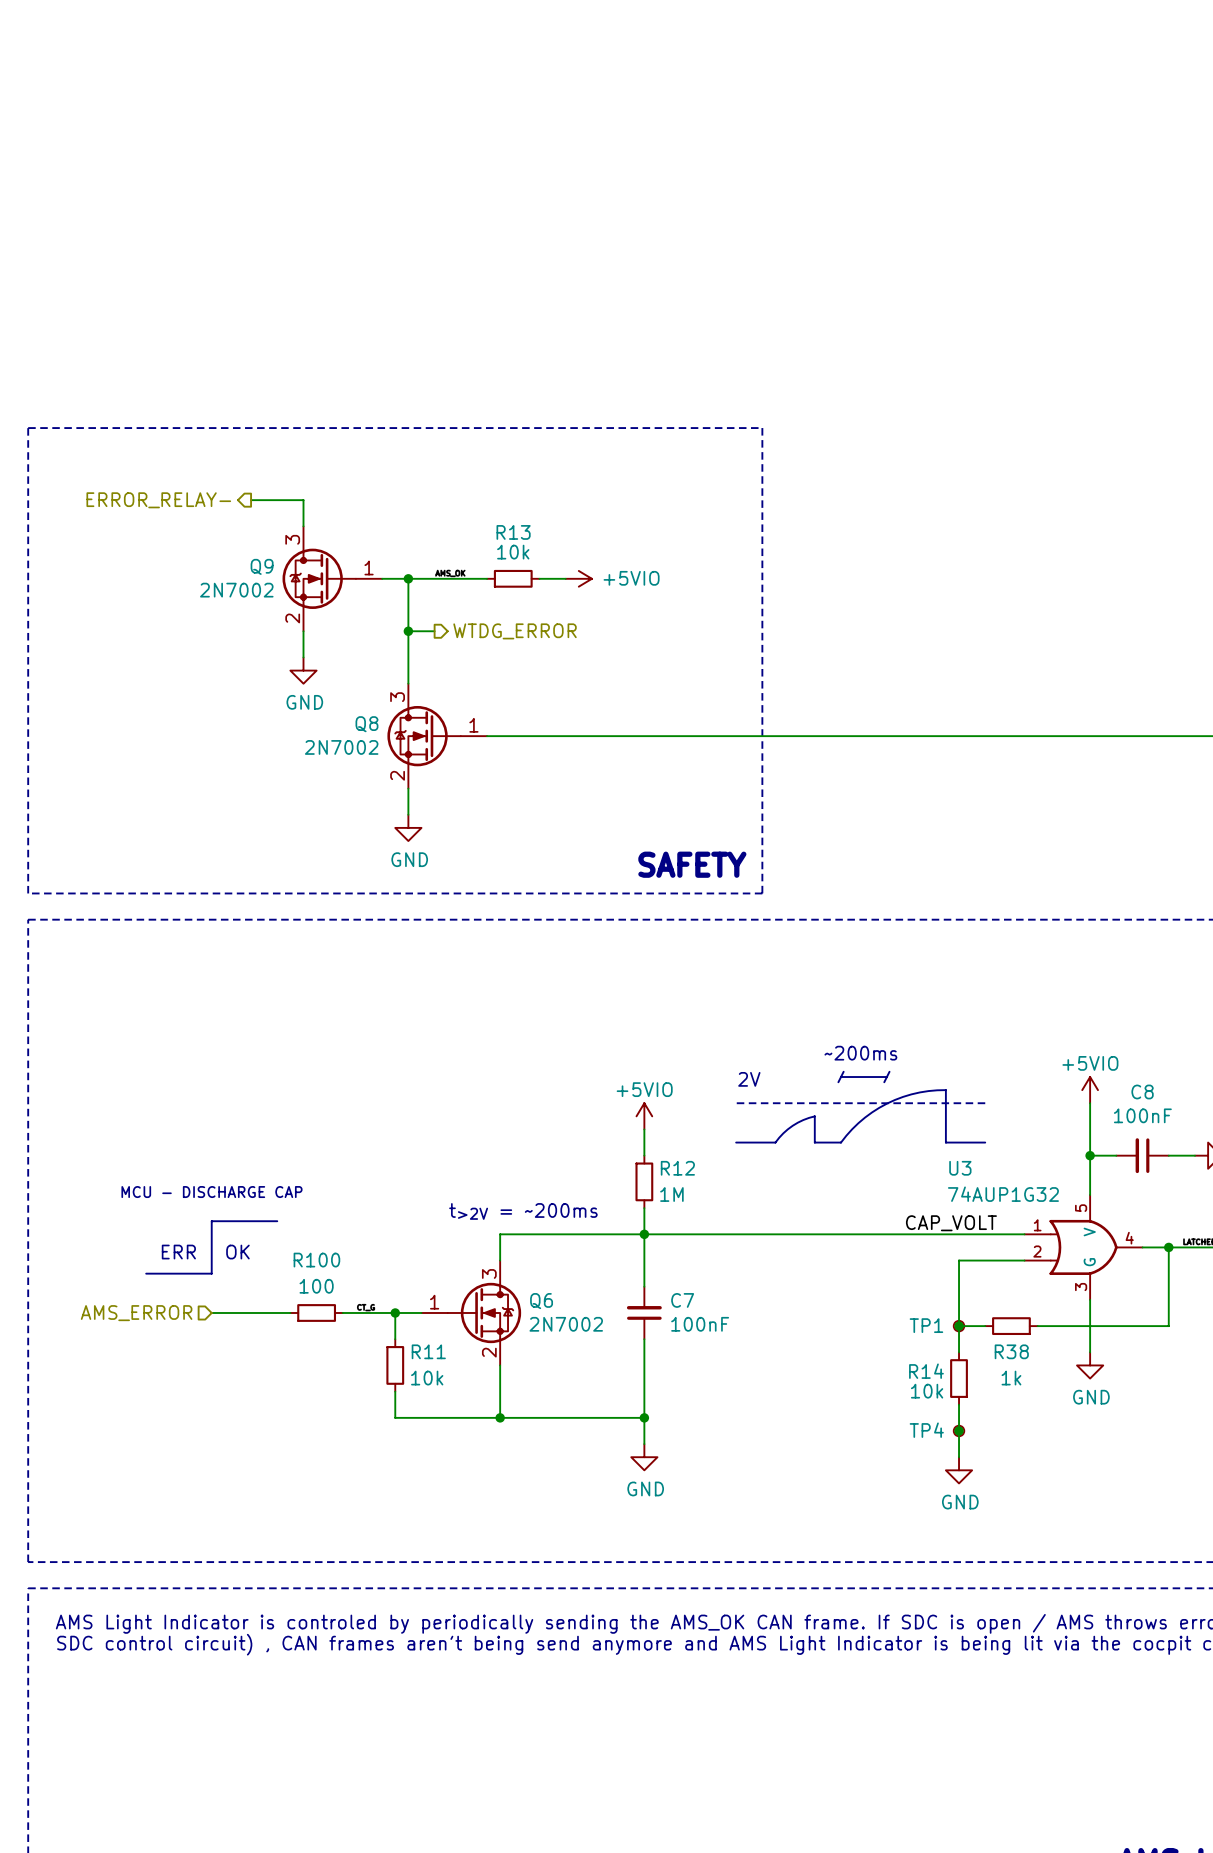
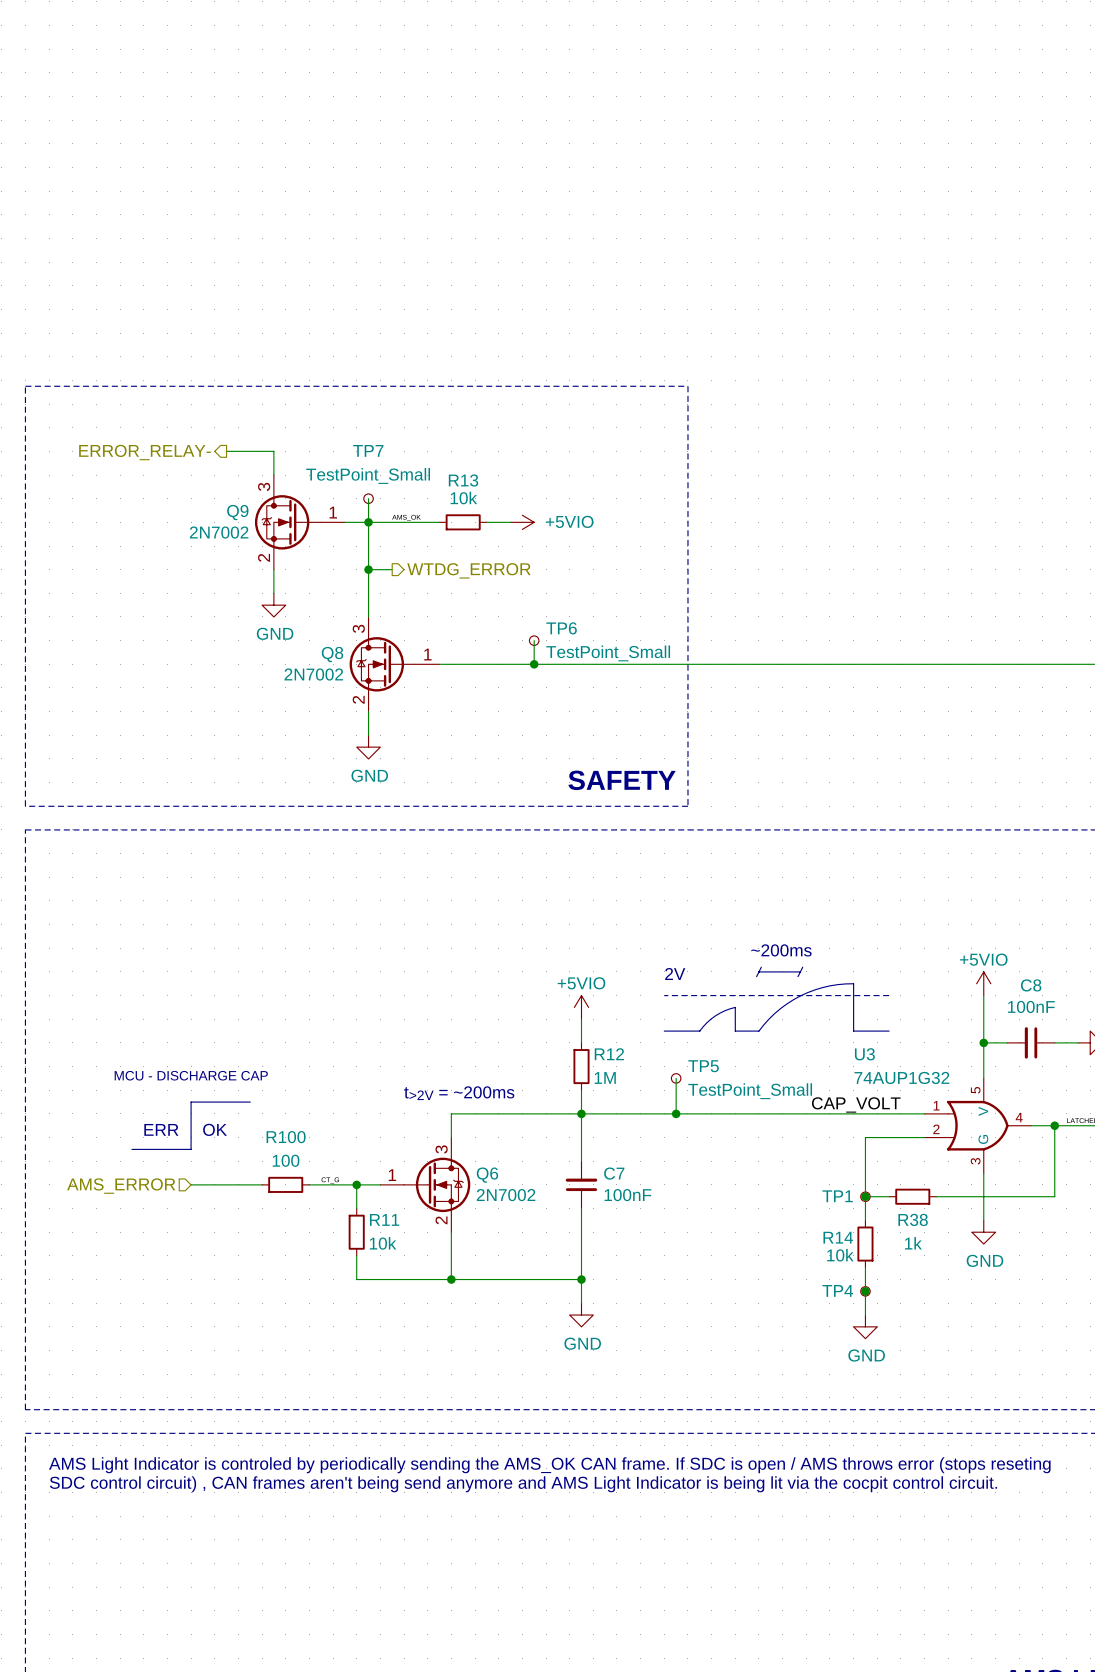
wire: none -> (368, 498) (368, 522)
TP7: none -> TestPoint_Small (368, 498)
wire: none -> (534, 640) (534, 664)
TP6: none -> TestPoint_Small (534, 640)
junction: none -> (534, 664)
wire: none -> (676, 1078) (676, 1113)
TP5: none -> TestPoint_Small (676, 1078)
junction: none -> (676, 1113)

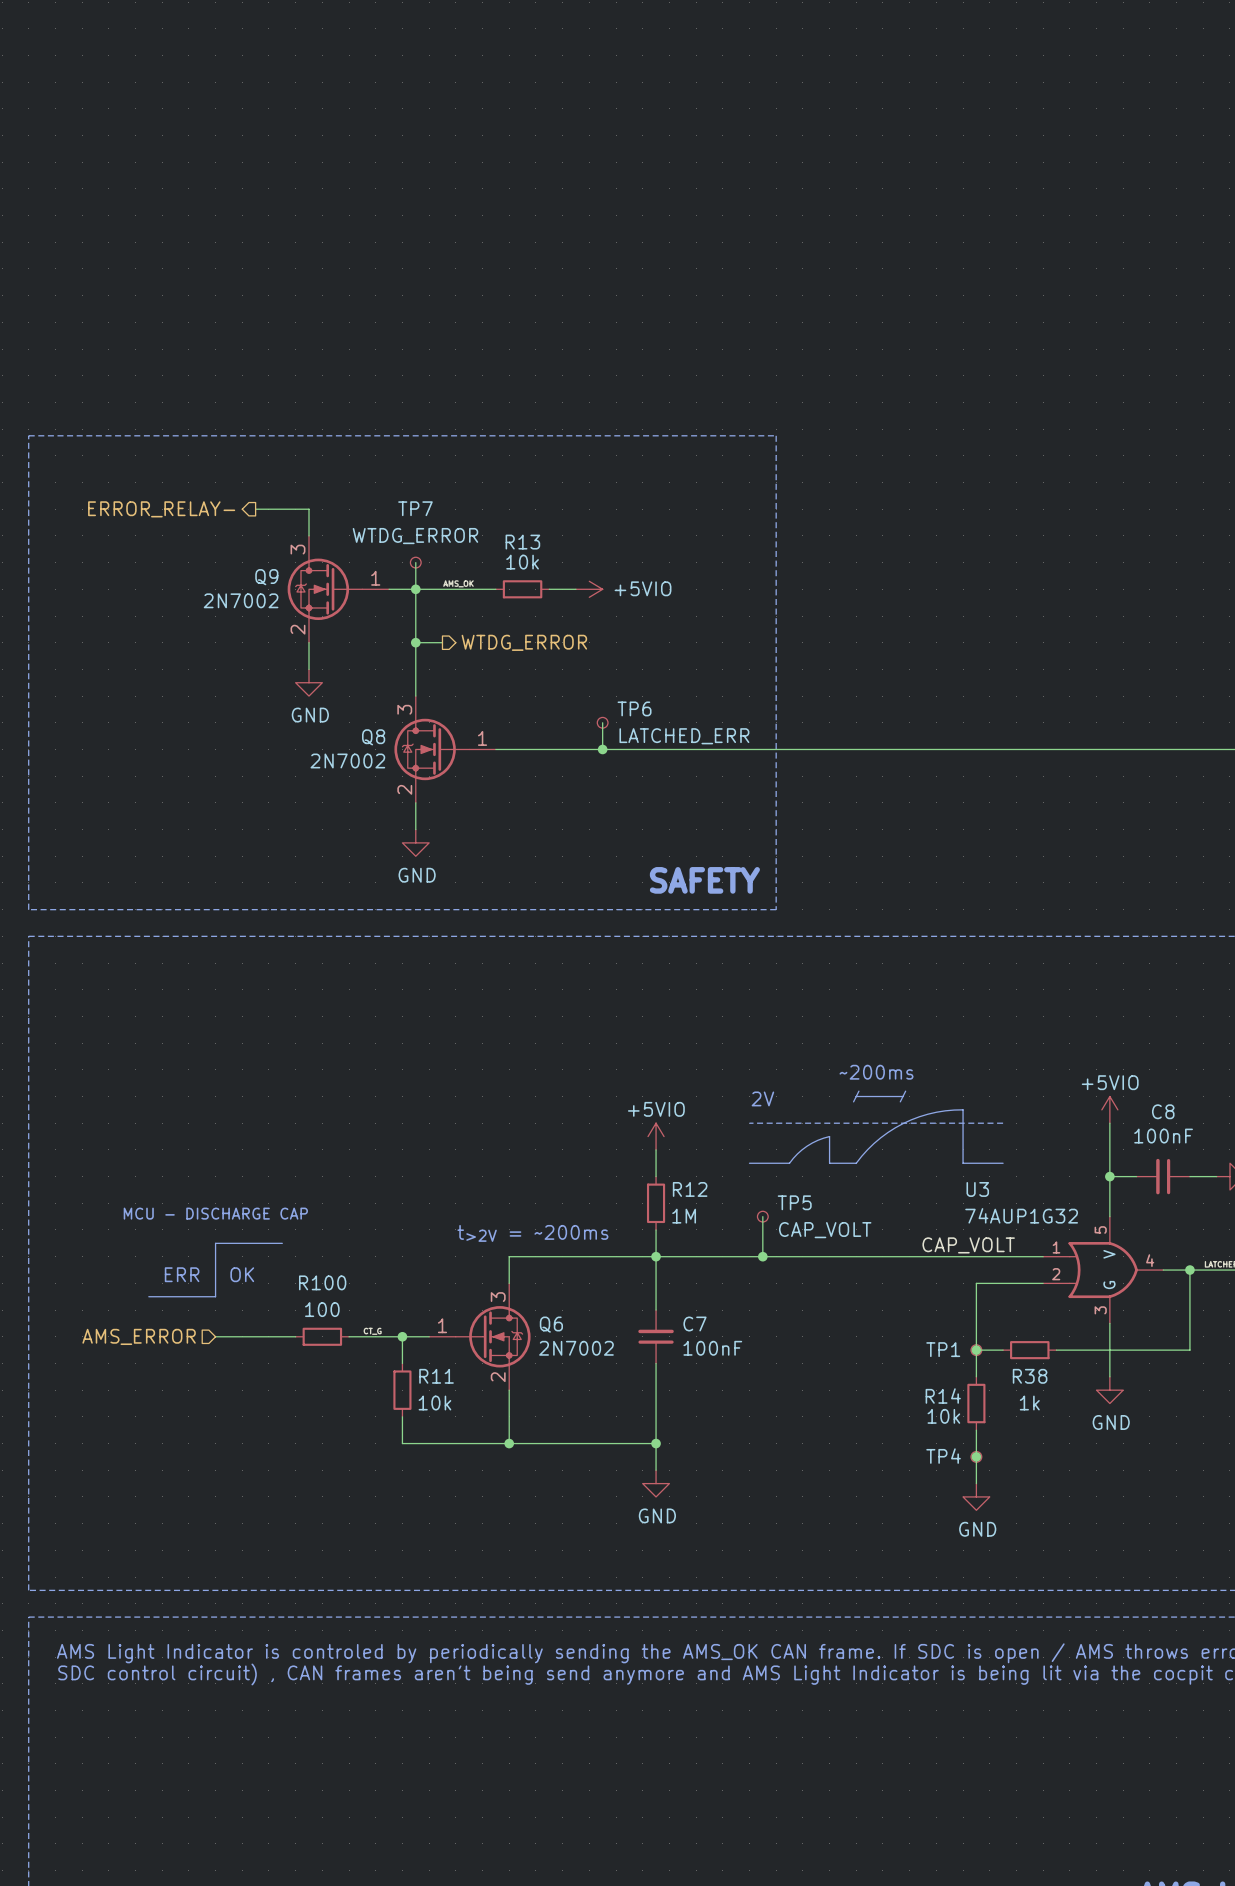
TP7 value: TestPoint_Small (368, 475) -> WTDG_ERROR (415, 536)
TP6 value: TestPoint_Small (608, 653) -> LATCHED_ERR (684, 736)
TP5 value: TestPoint_Small (750, 1091) -> CAP_VOLT (825, 1230)

